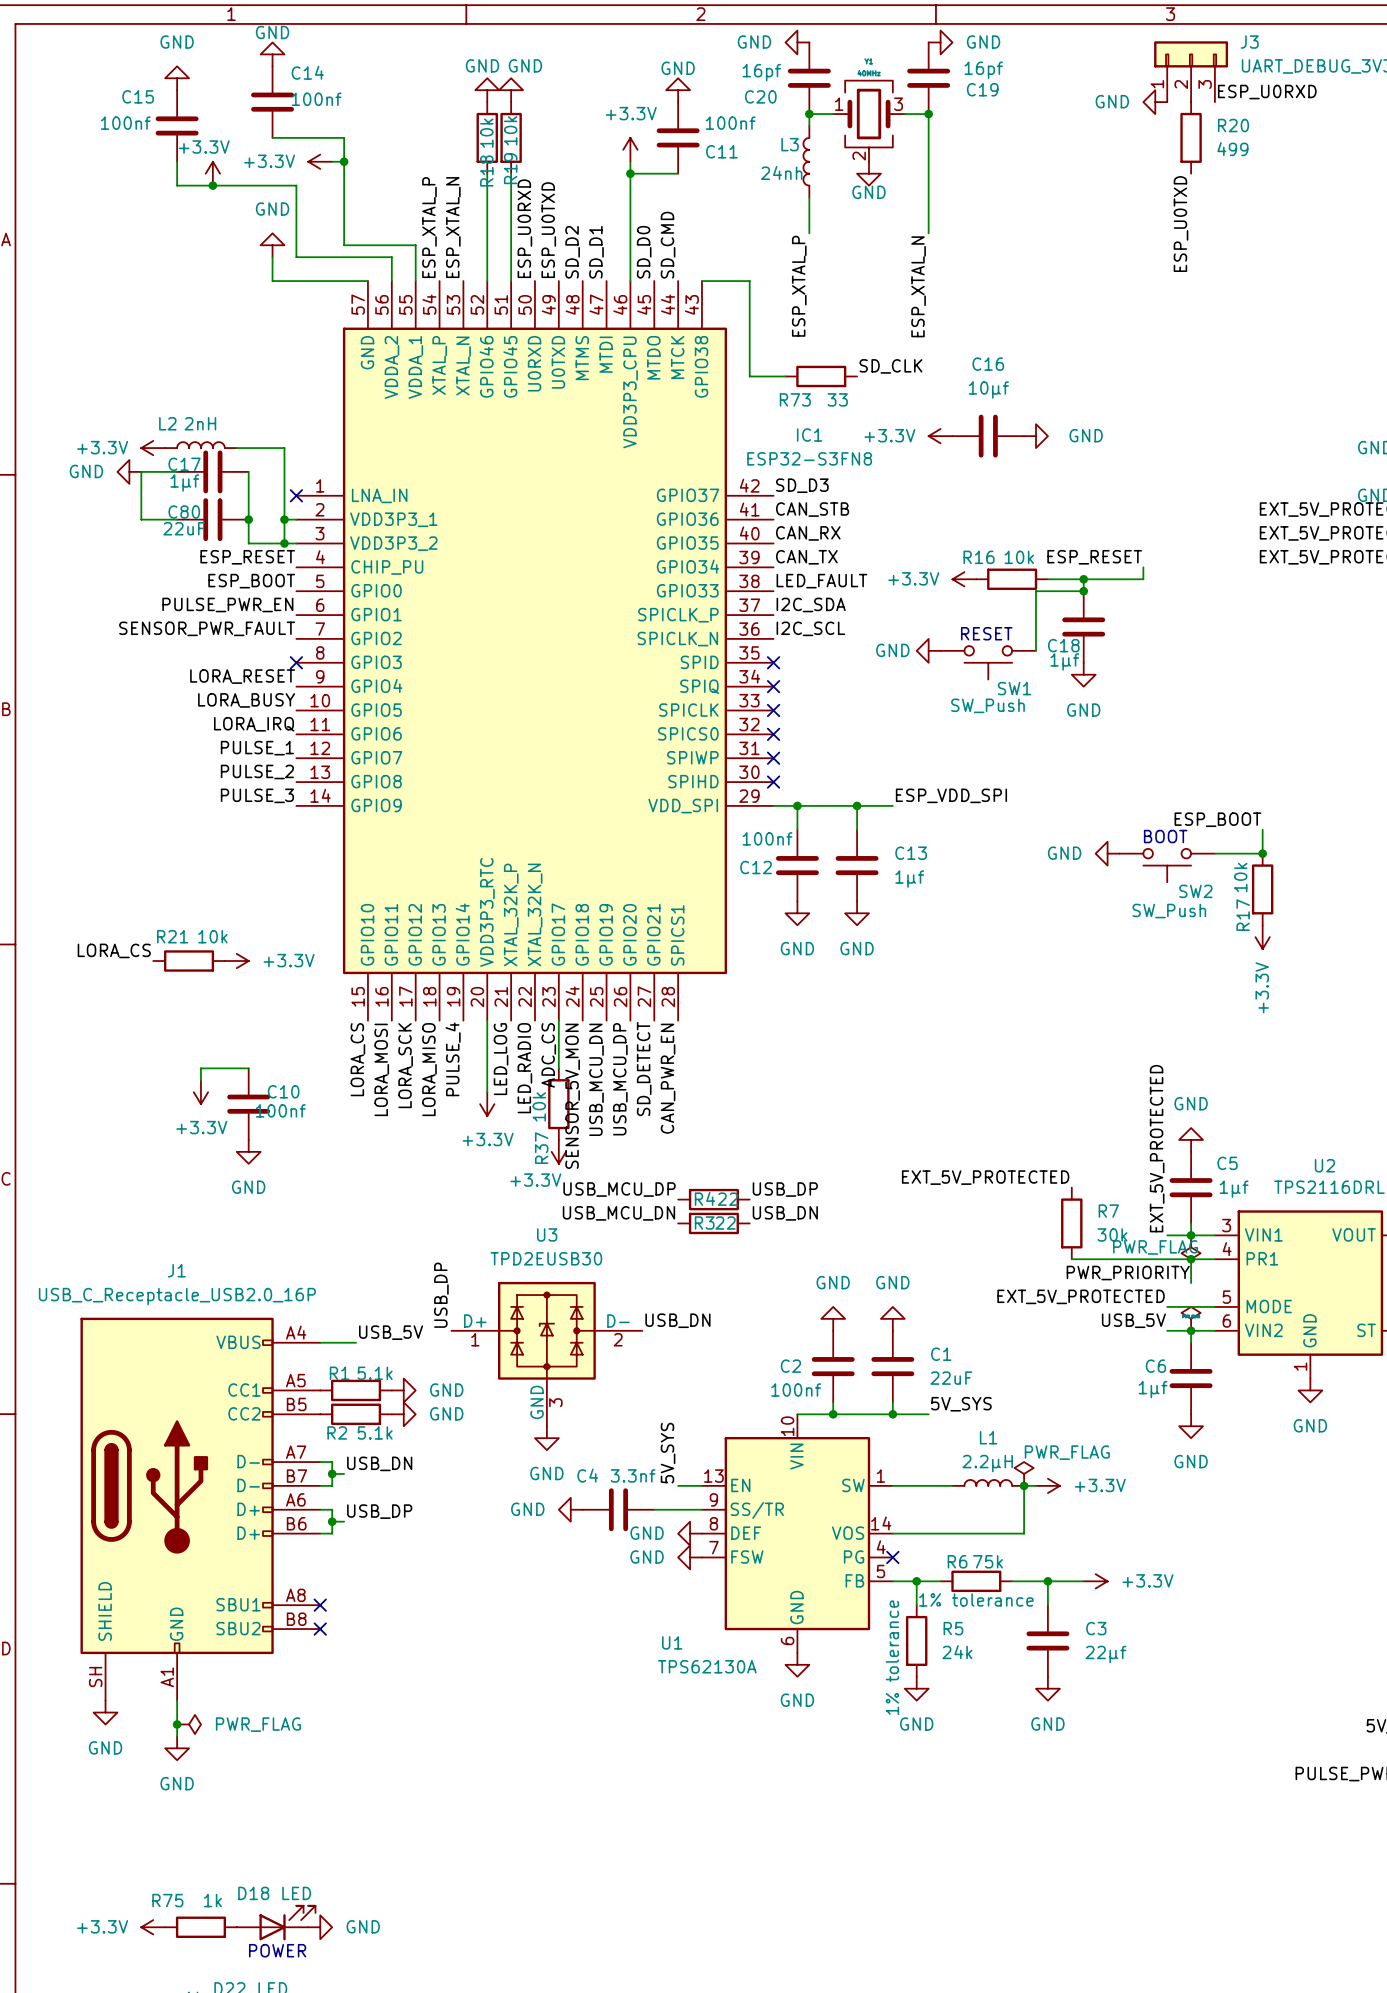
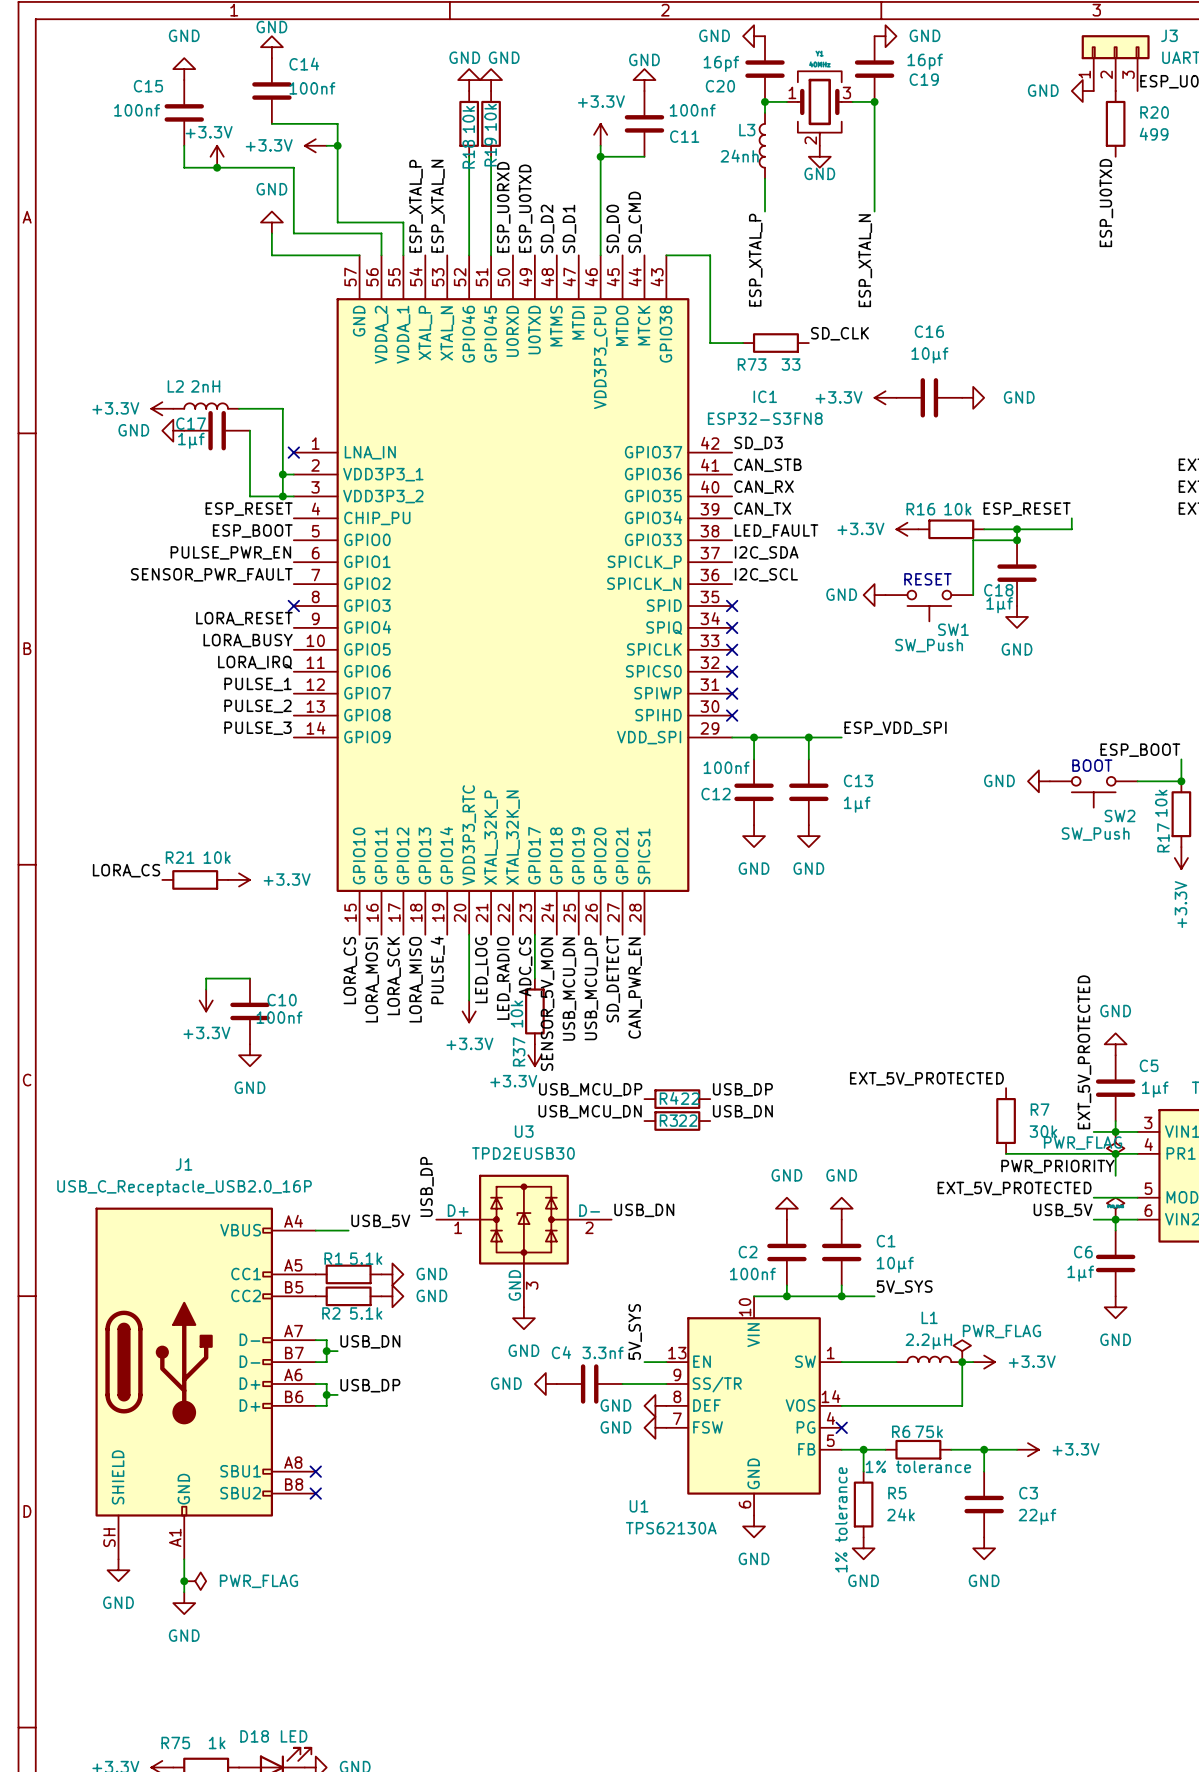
power symbol position: GND (129, 471) -> GND (173, 430)
wire: (177, 471) (141, 471) (141, 519) (177, 519) -> none
C80: 22uF (212, 519) -> none
junction: (248, 519) -> none
C1 value: 22uF (951, 1378) -> 10µf (895, 1264)

